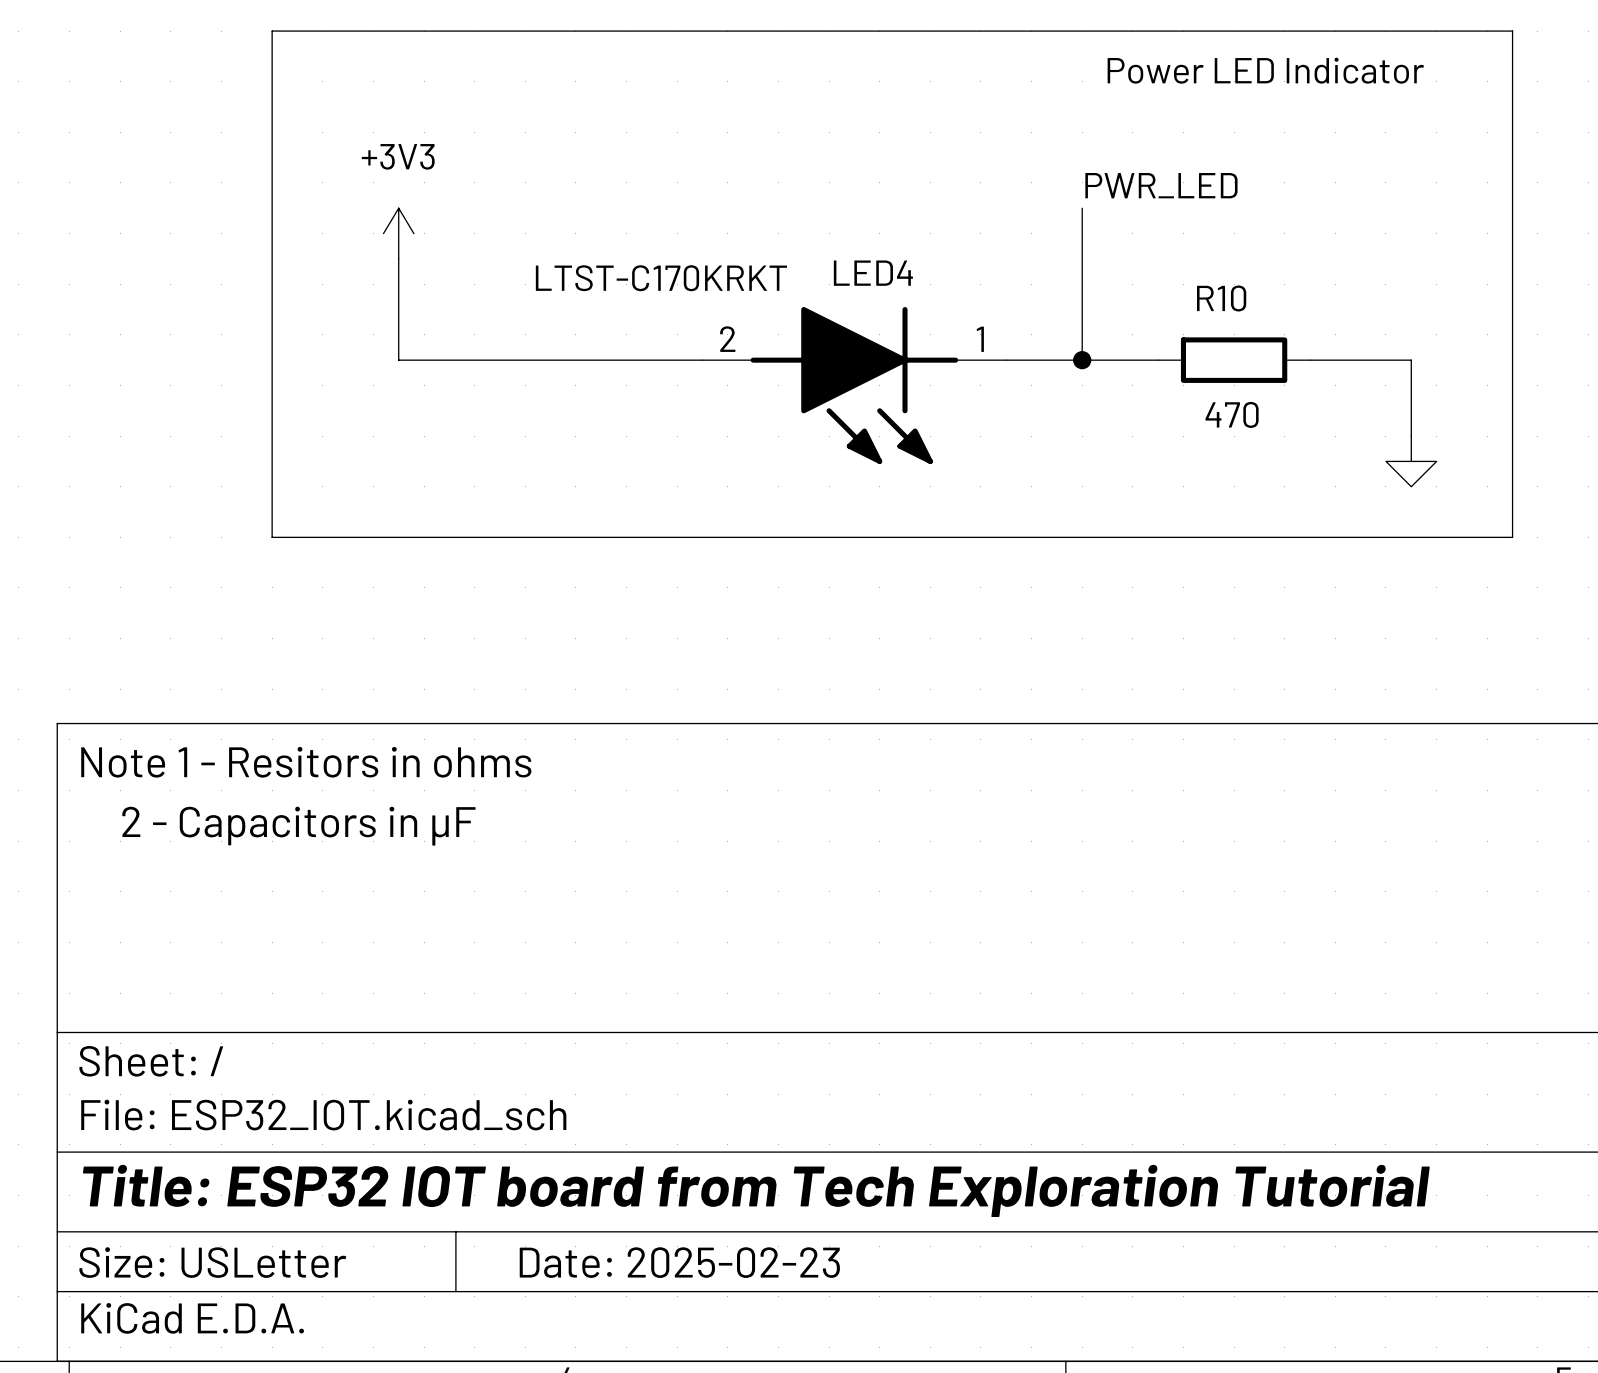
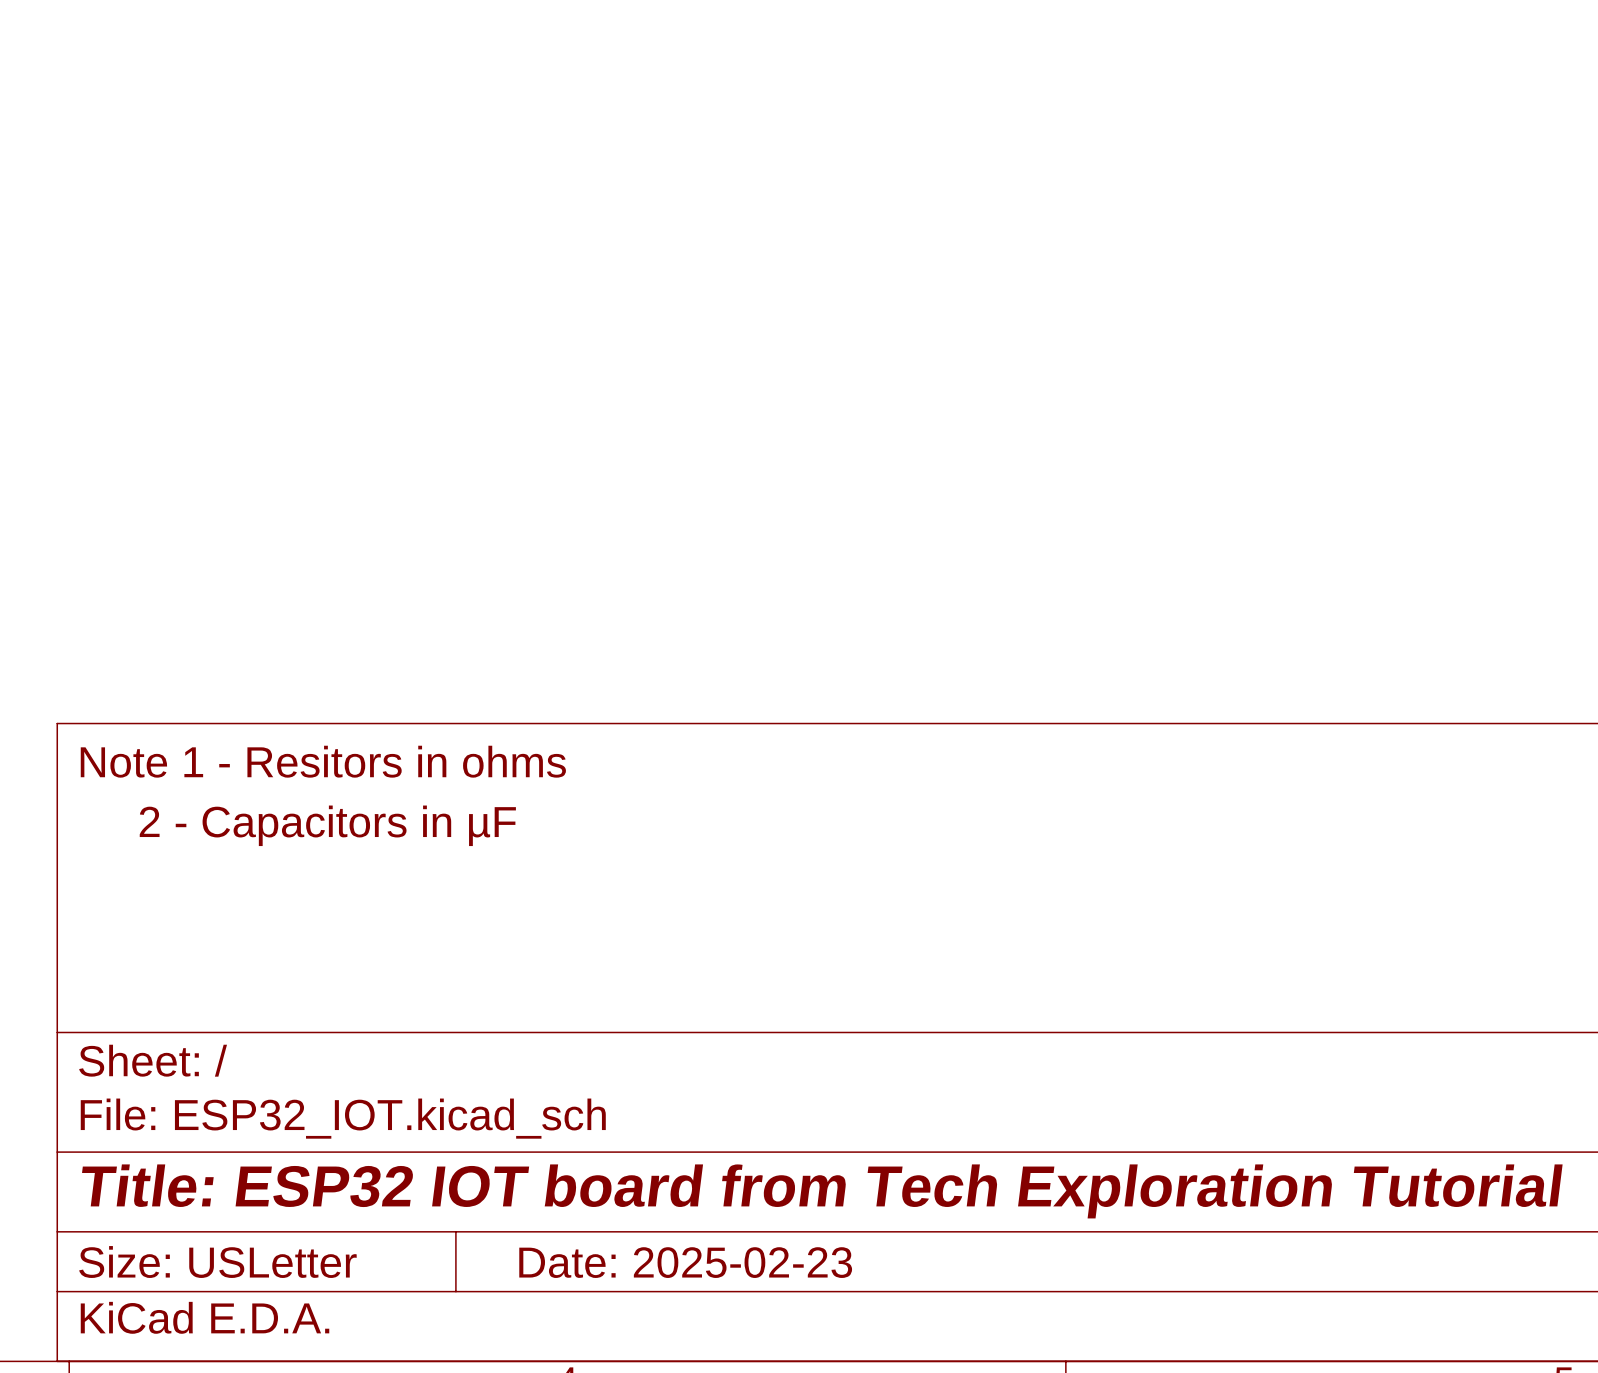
line: (272, 31) (1512, 31) (1512, 537) (272, 537) (272, 31) -> none
text: Power LED Indicator (1265, 70) -> none
label: PWR_LED (1161, 185) -> none
wire: (1082, 208) (1082, 360) -> none
power symbol: +3V3 (398, 233) -> none
wire: (398, 258) (398, 360) (702, 360) -> none
wire: (1006, 360) (1158, 360) -> none
junction: (1082, 360) -> none
R10: 470 (1234, 360) -> none
wire: (1310, 360) (1411, 360) (1411, 436) -> none
LED4: LTST-C170KRKT (854, 385) -> none
power symbol: (1411, 461) -> none

